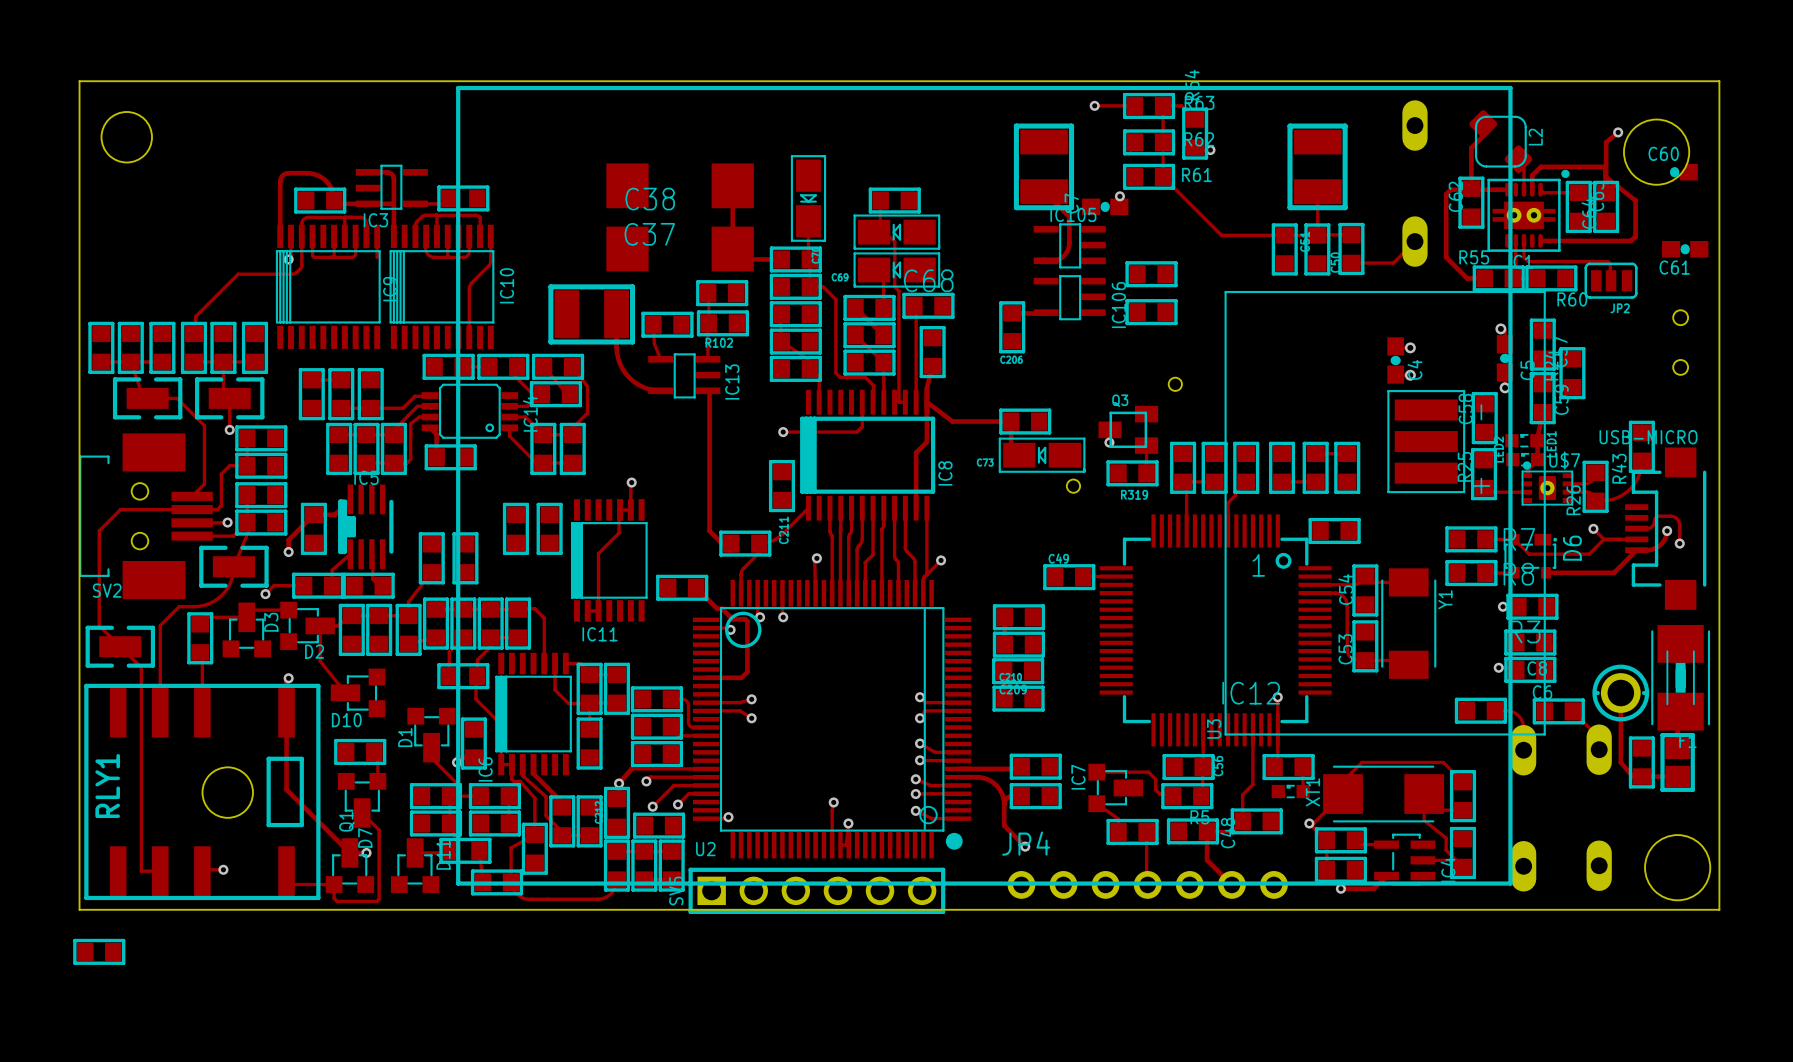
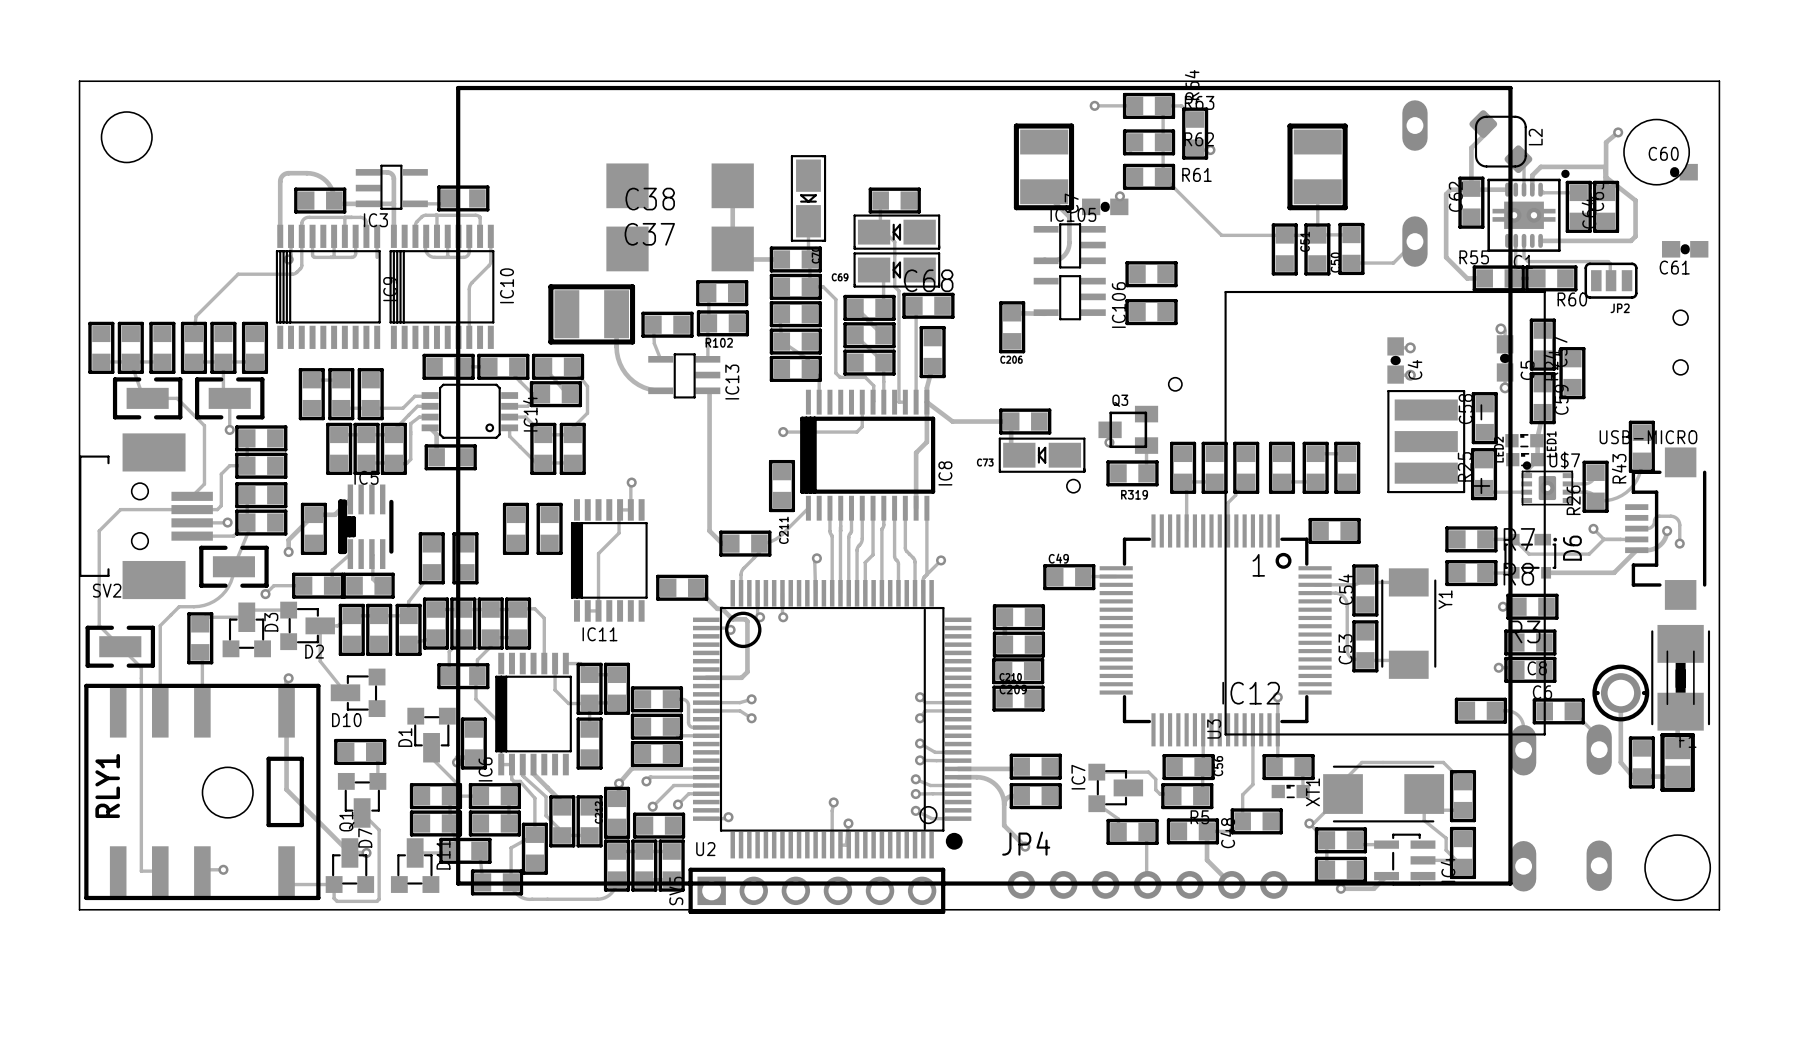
part: (99, 951) -> none

